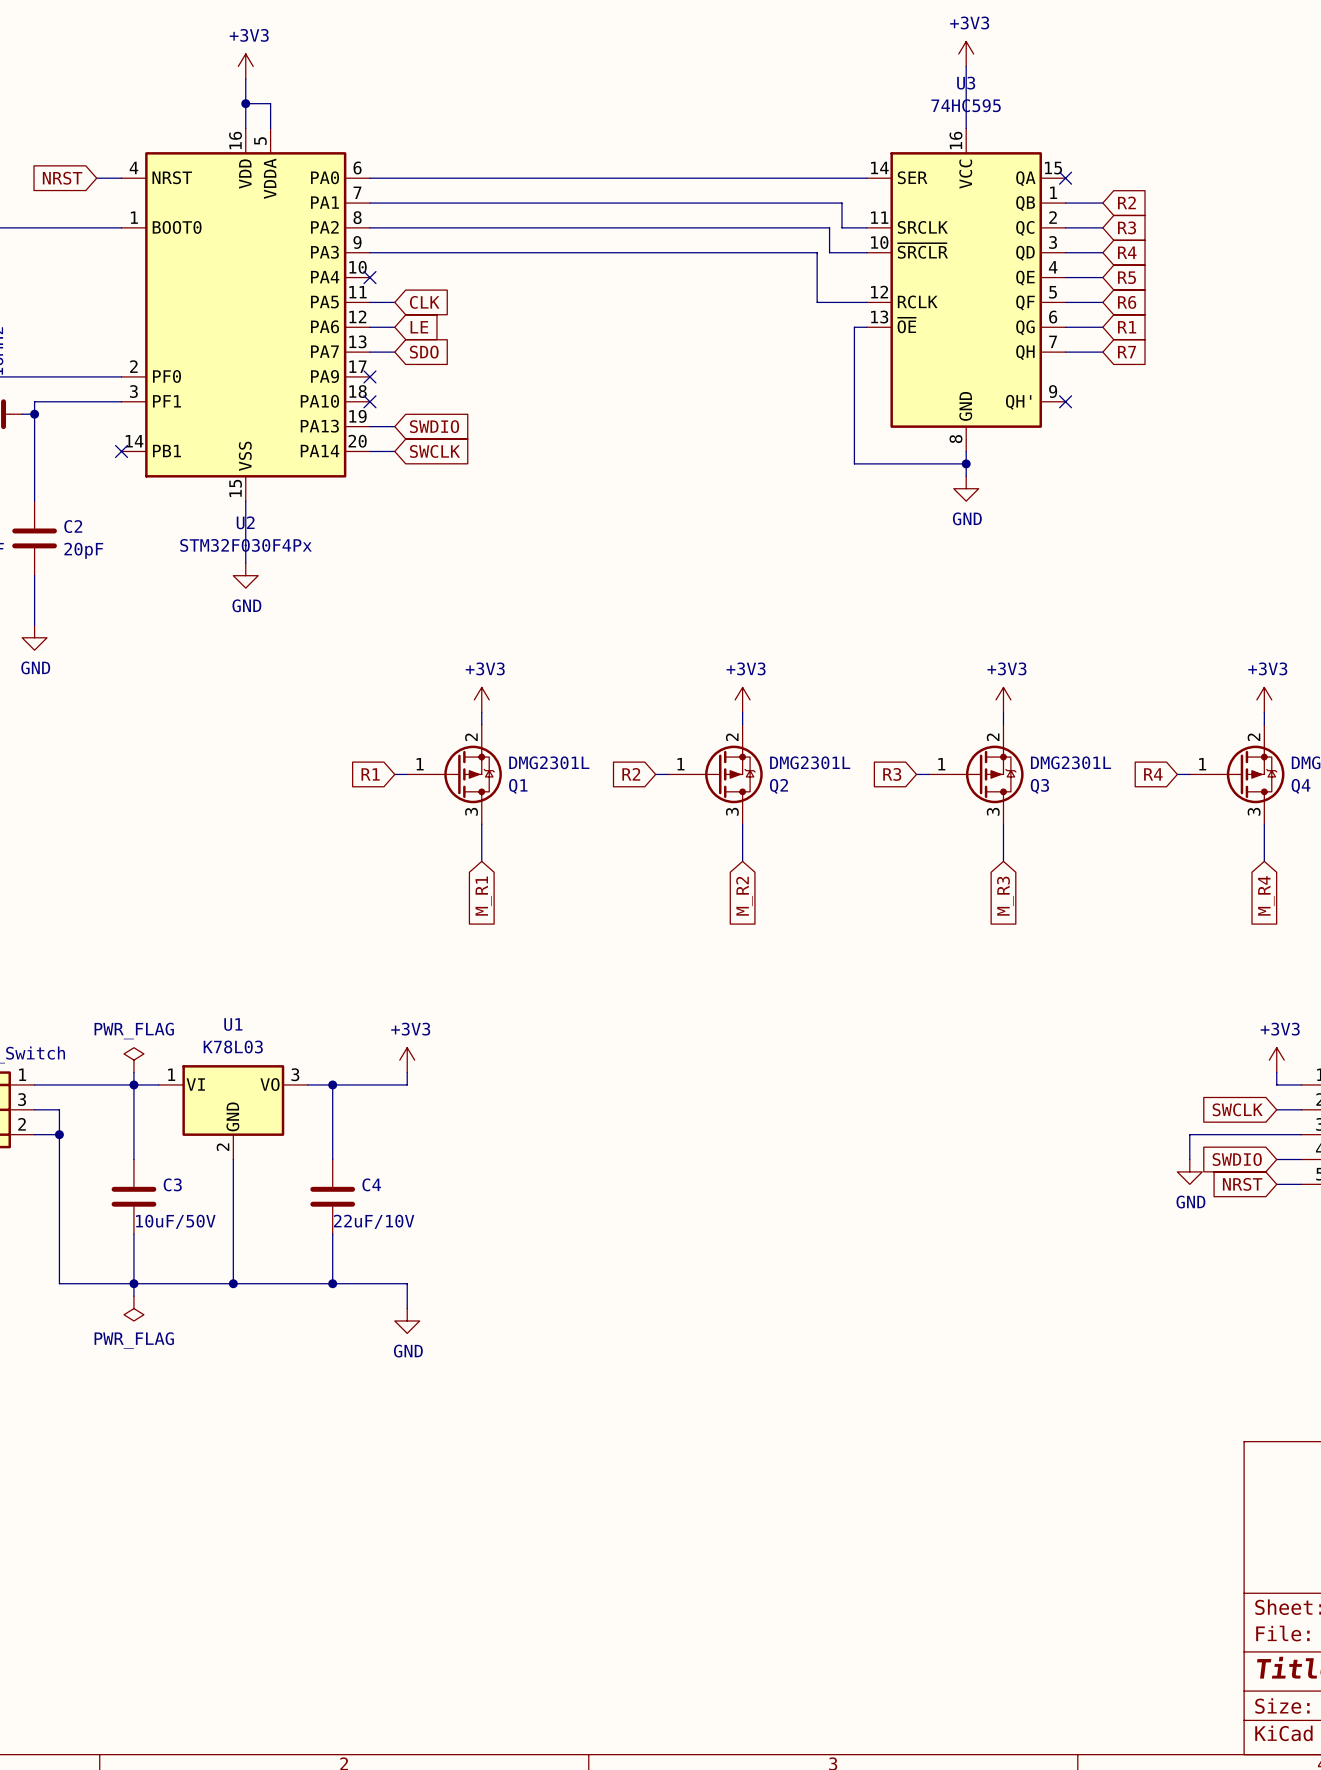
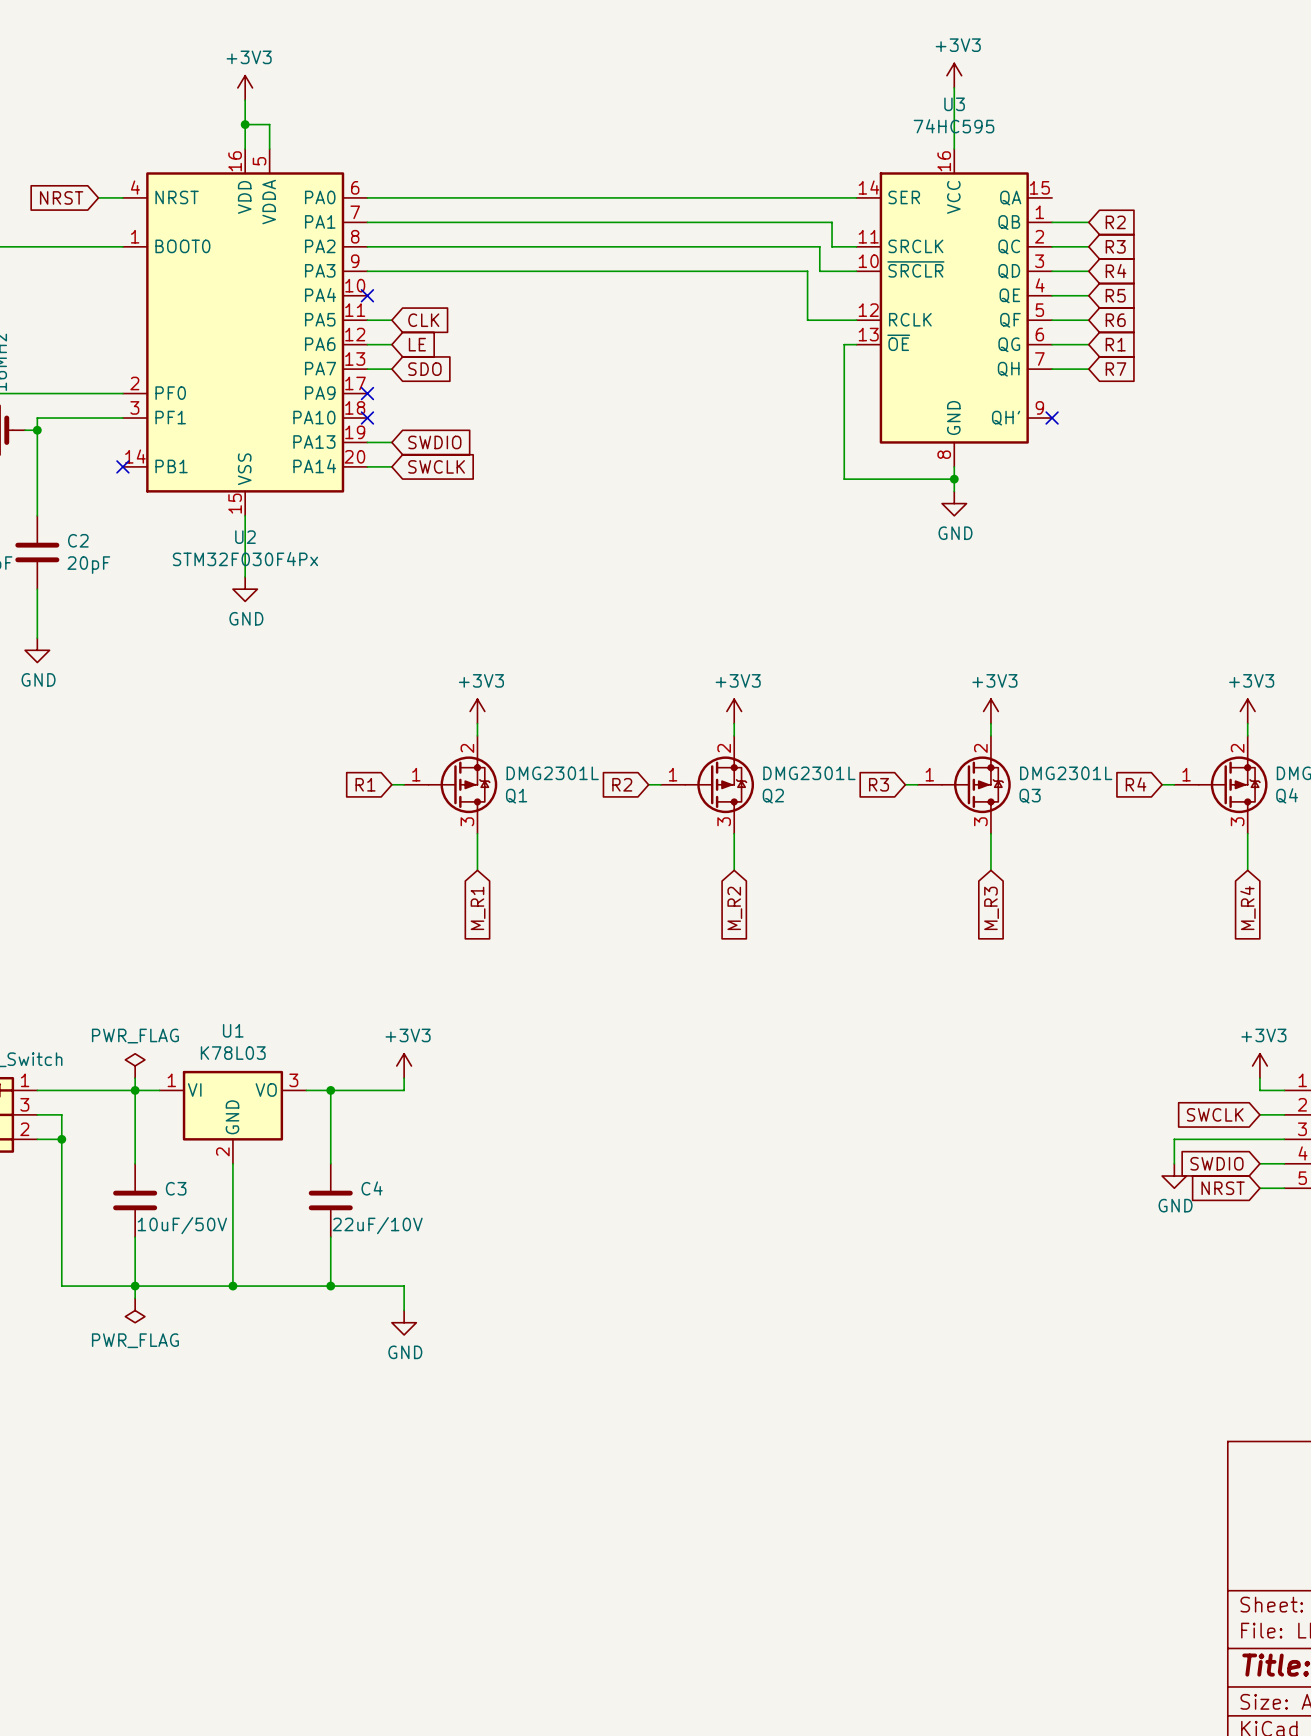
no-connect mark: (1065, 178) -> none

